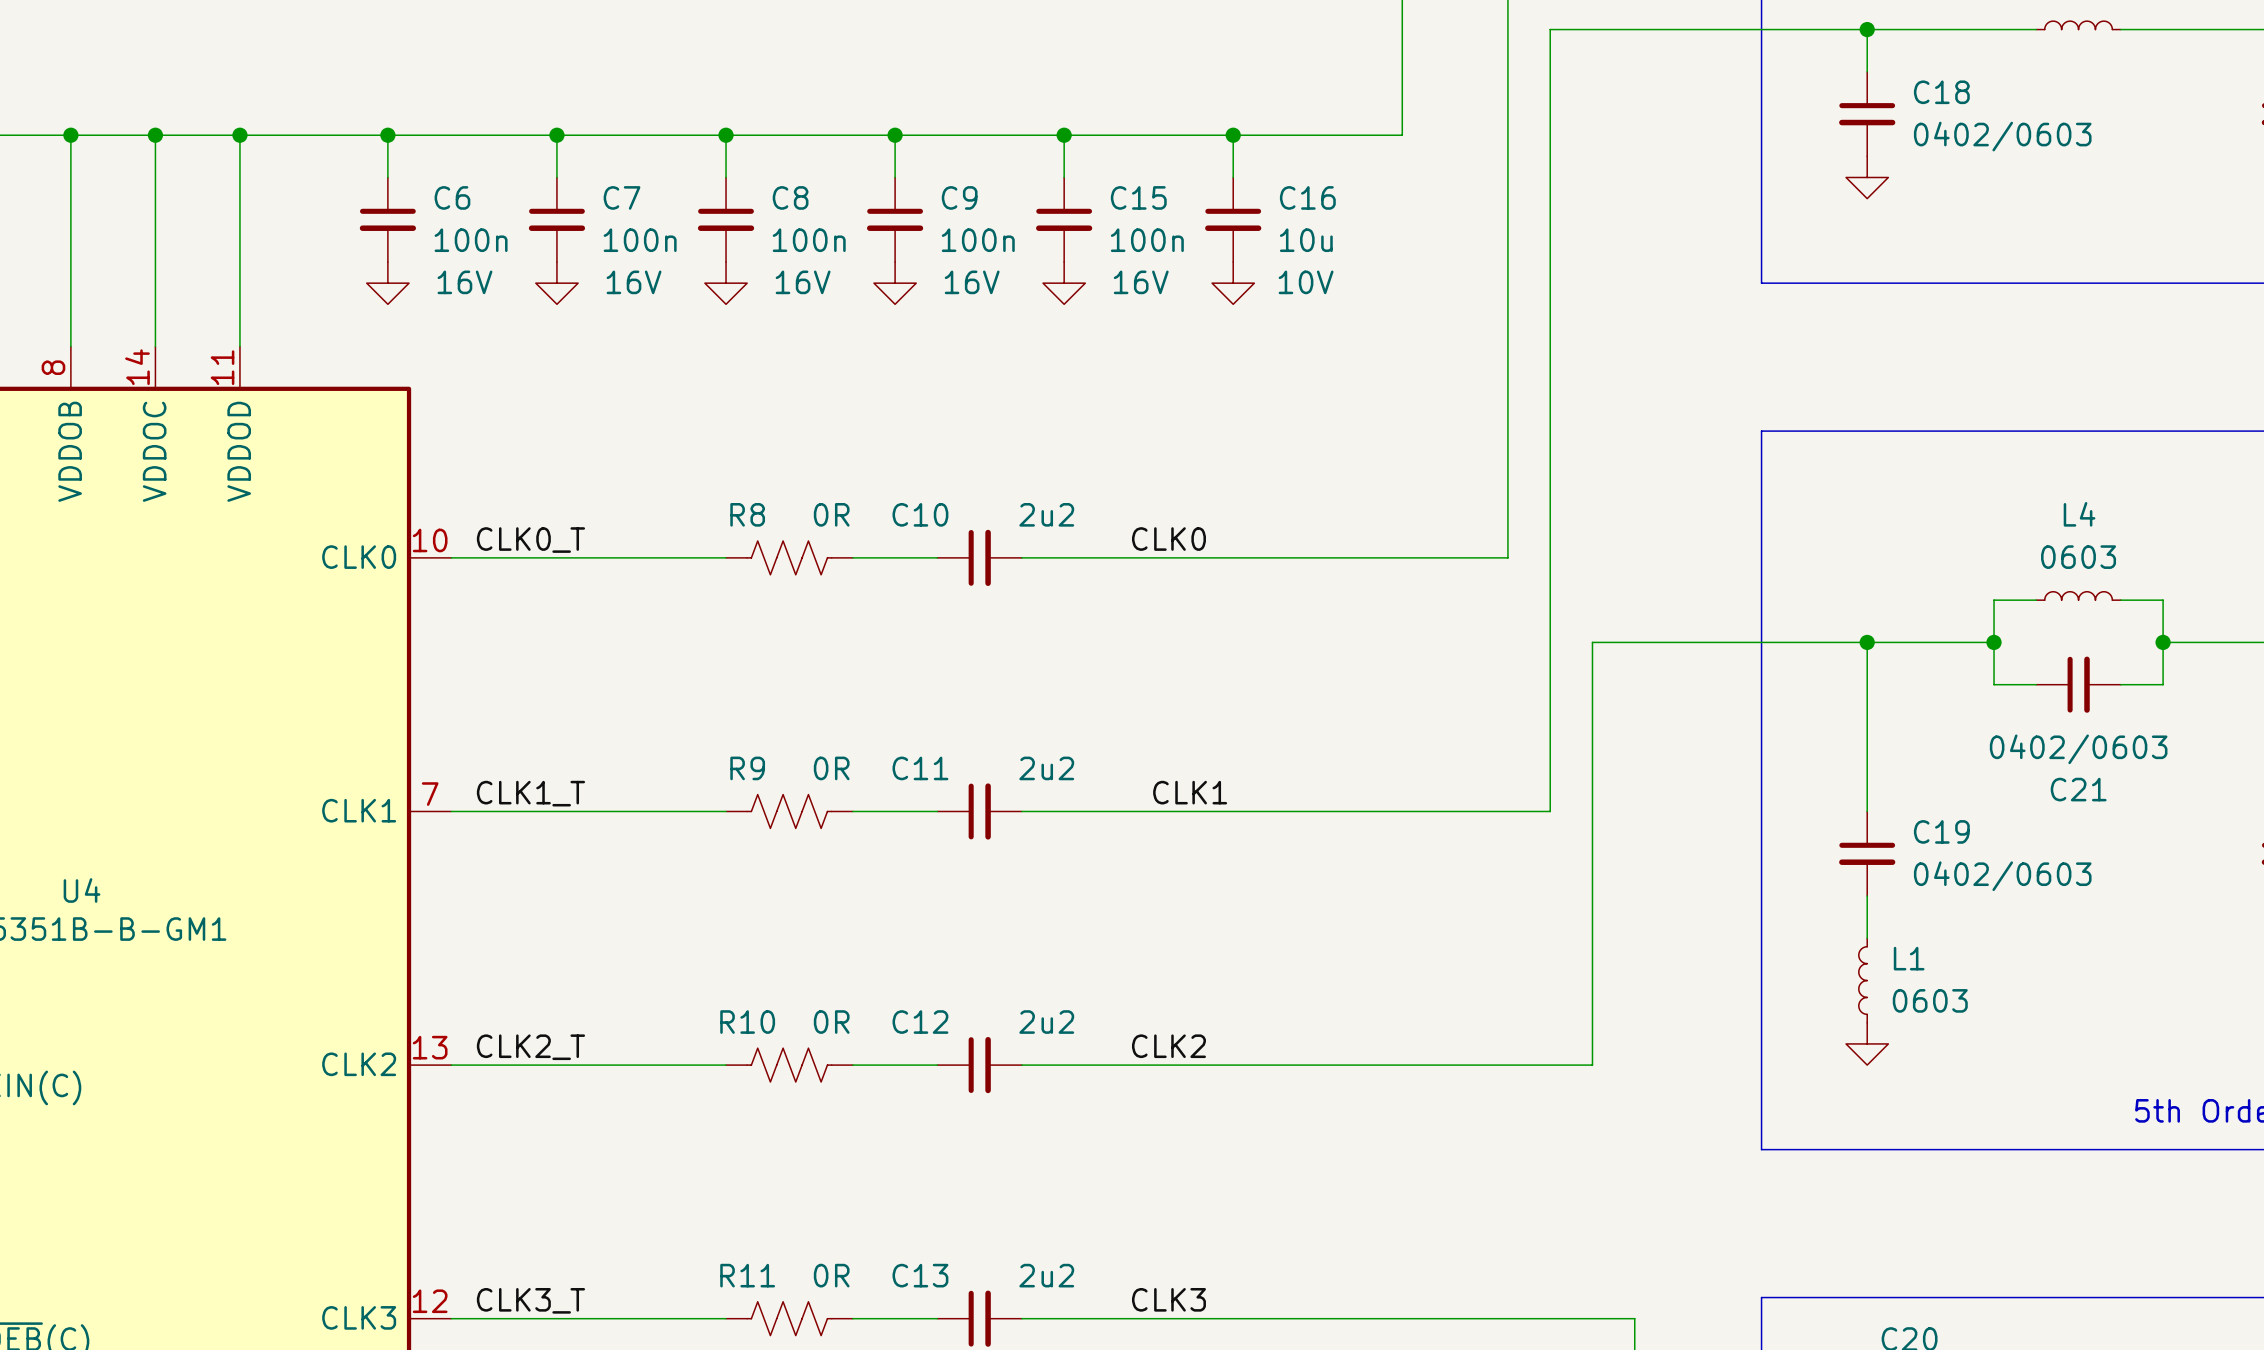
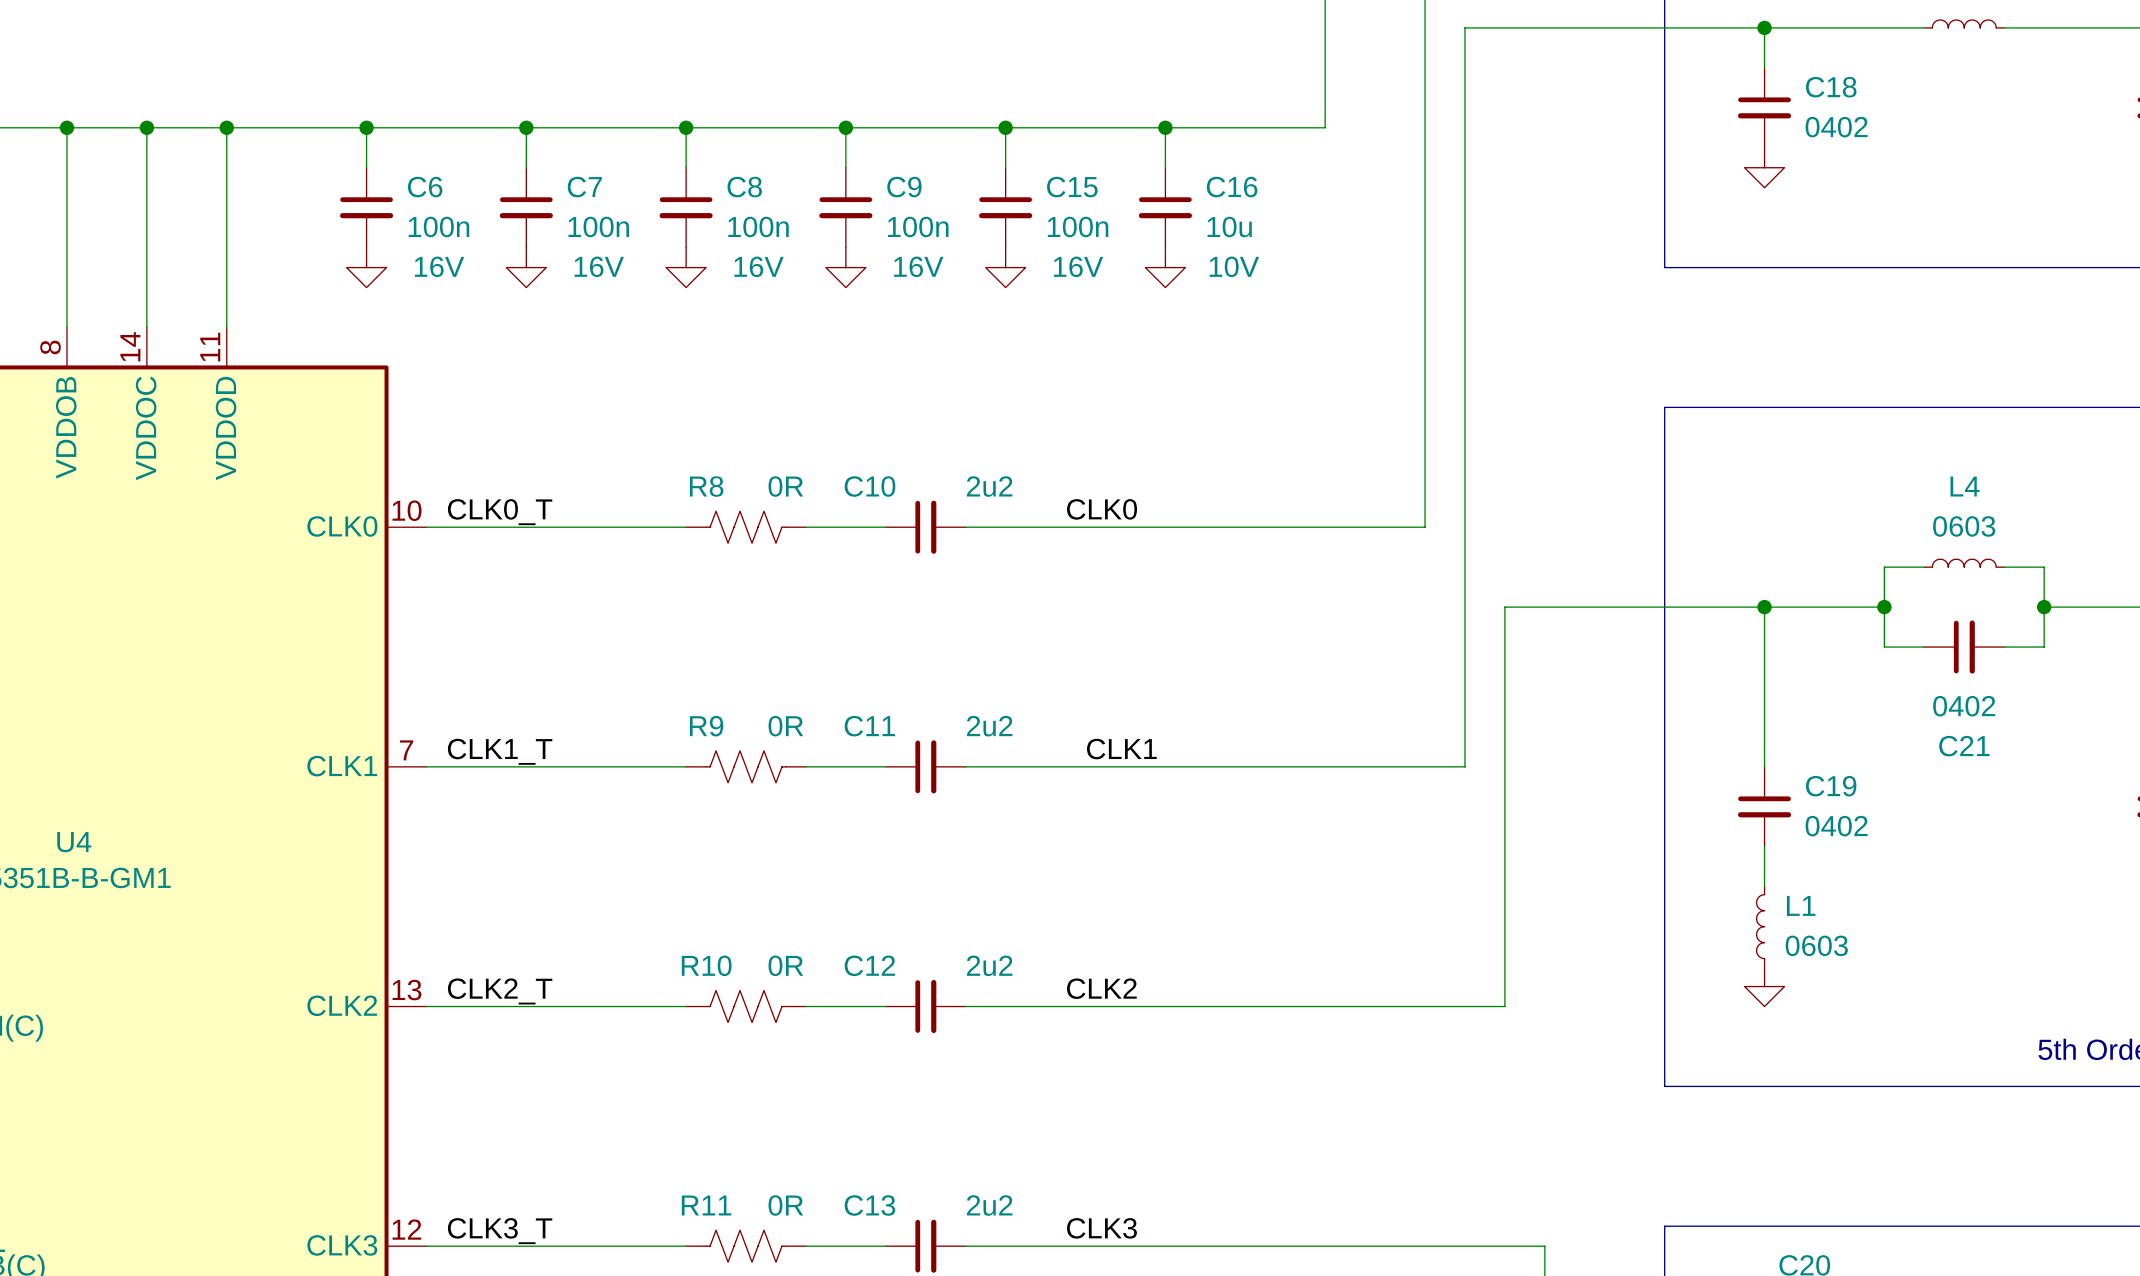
C18 value: 0402/0603 (2002, 136) -> 0402 (1836, 127)
C21 value: 0402/0603 (2078, 749) -> 0402 (1964, 706)
C19 value: 0402/0603 (2002, 876) -> 0402 (1836, 826)

